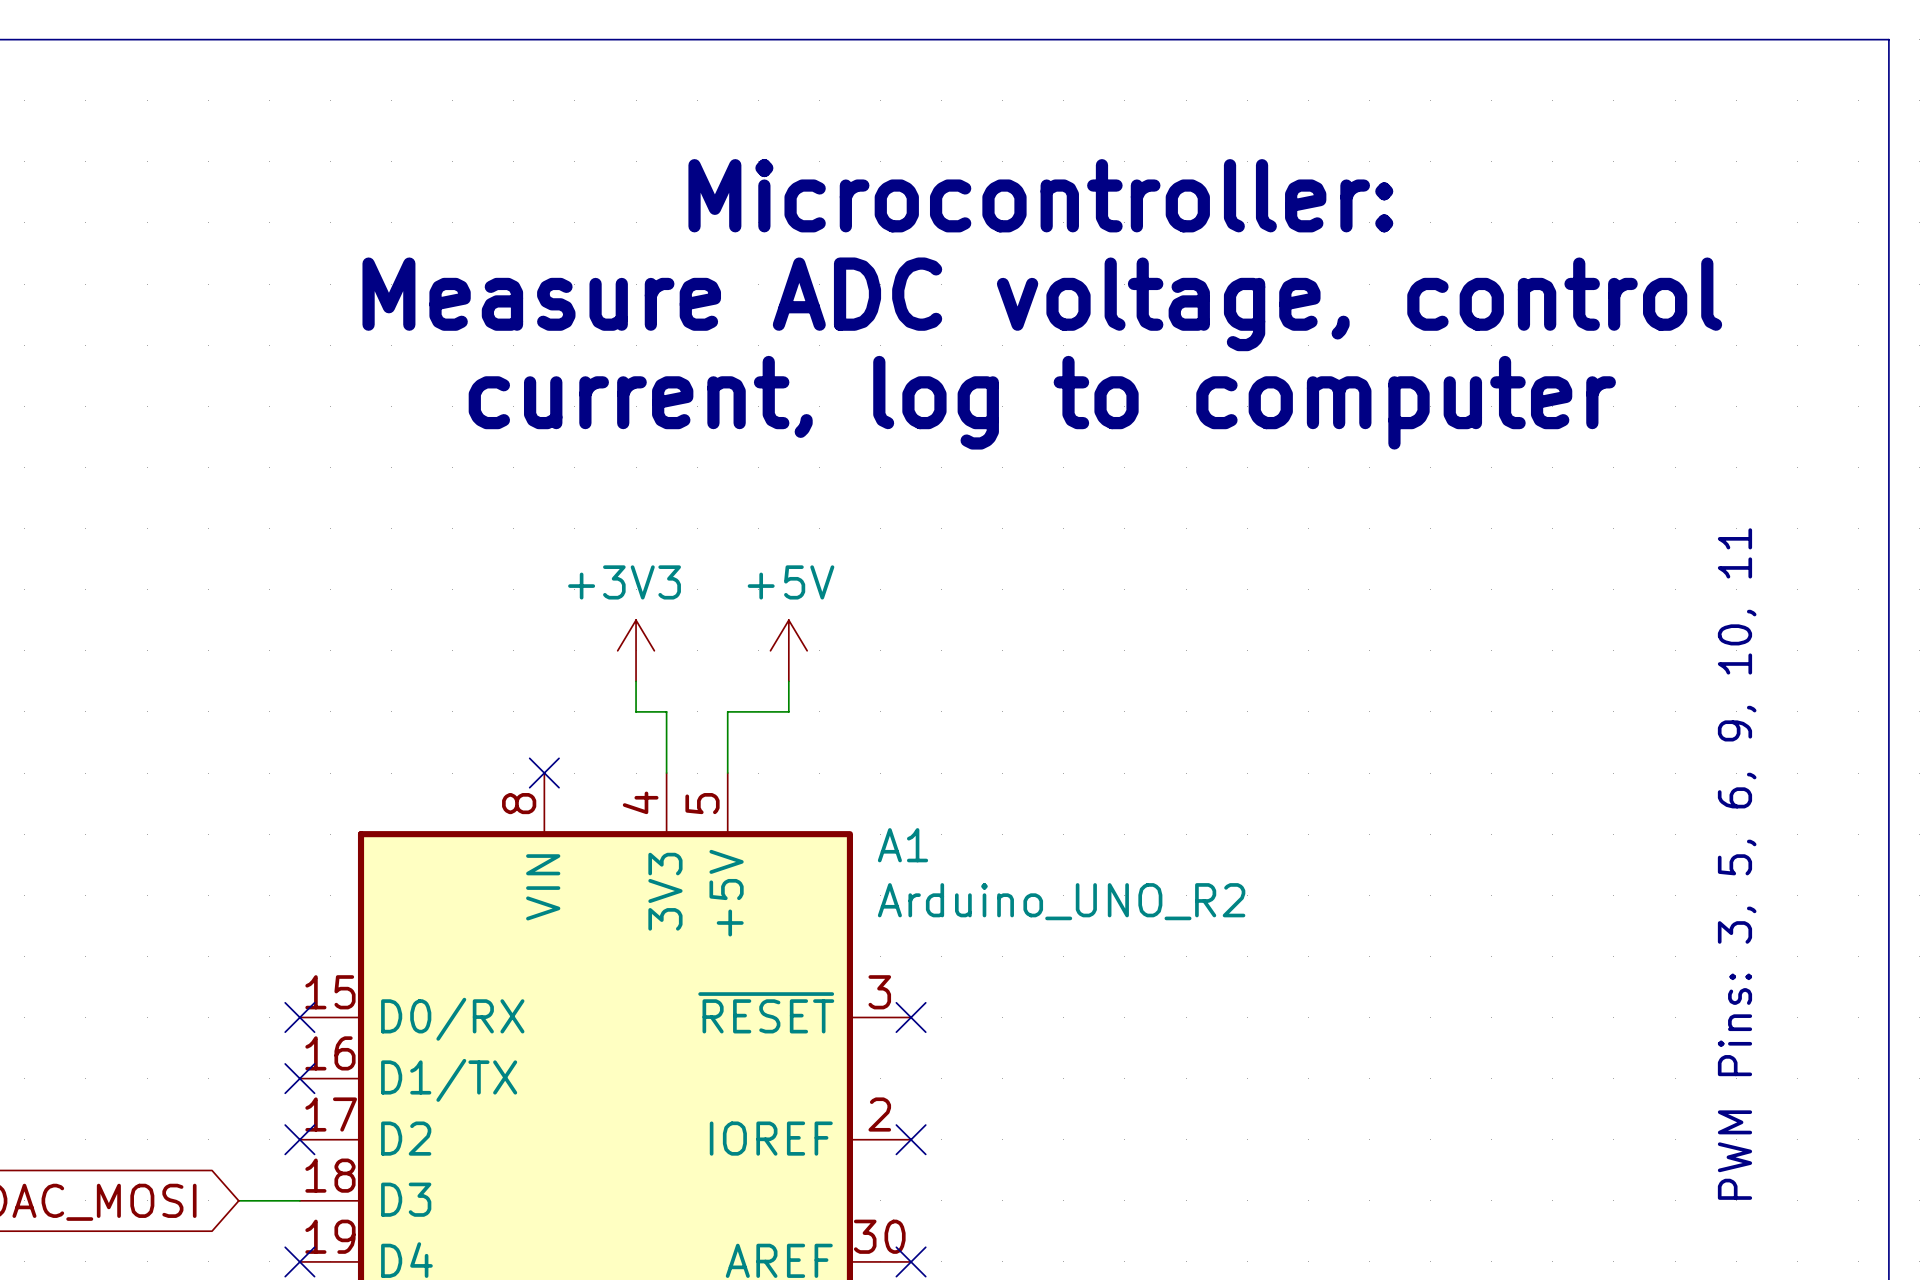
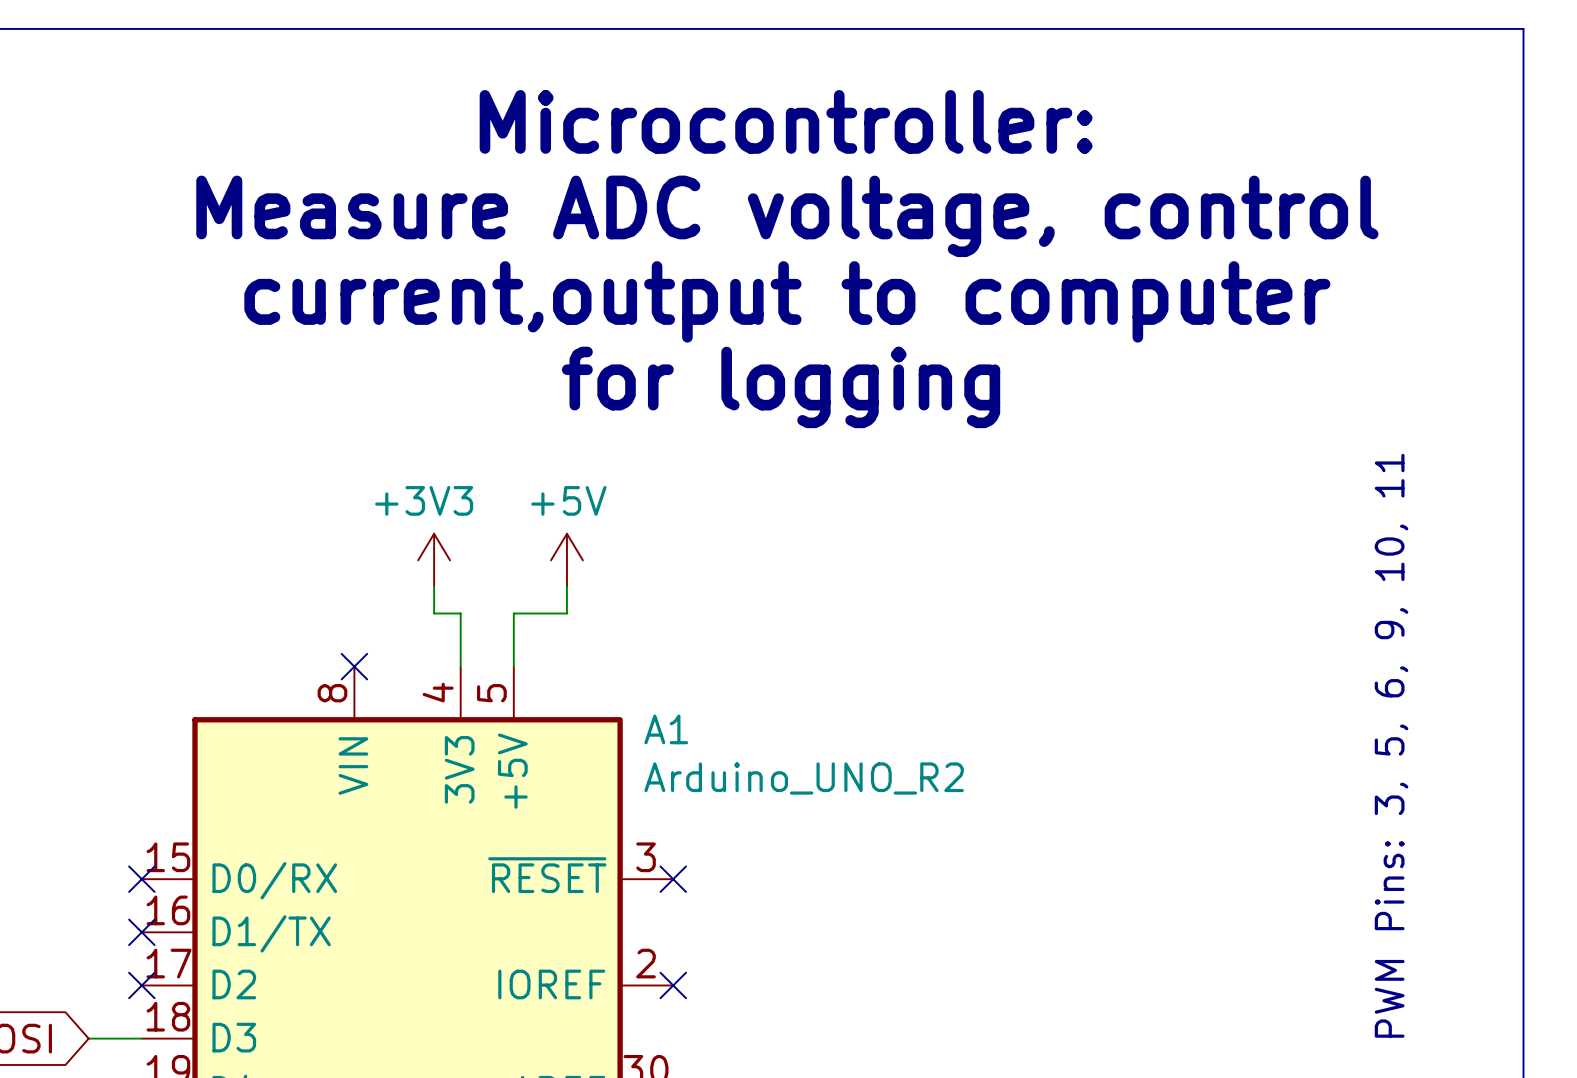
text position: Microcontroller: (1040, 195) -> Microcontroller: (786, 121)
text position: Measure ADC voltage, control (1042, 304) -> Measure ADC voltage, control (787, 216)
text: current, log to computer (1042, 402) -> current,output to computer (787, 301)
text: none -> for logging (781, 387)

